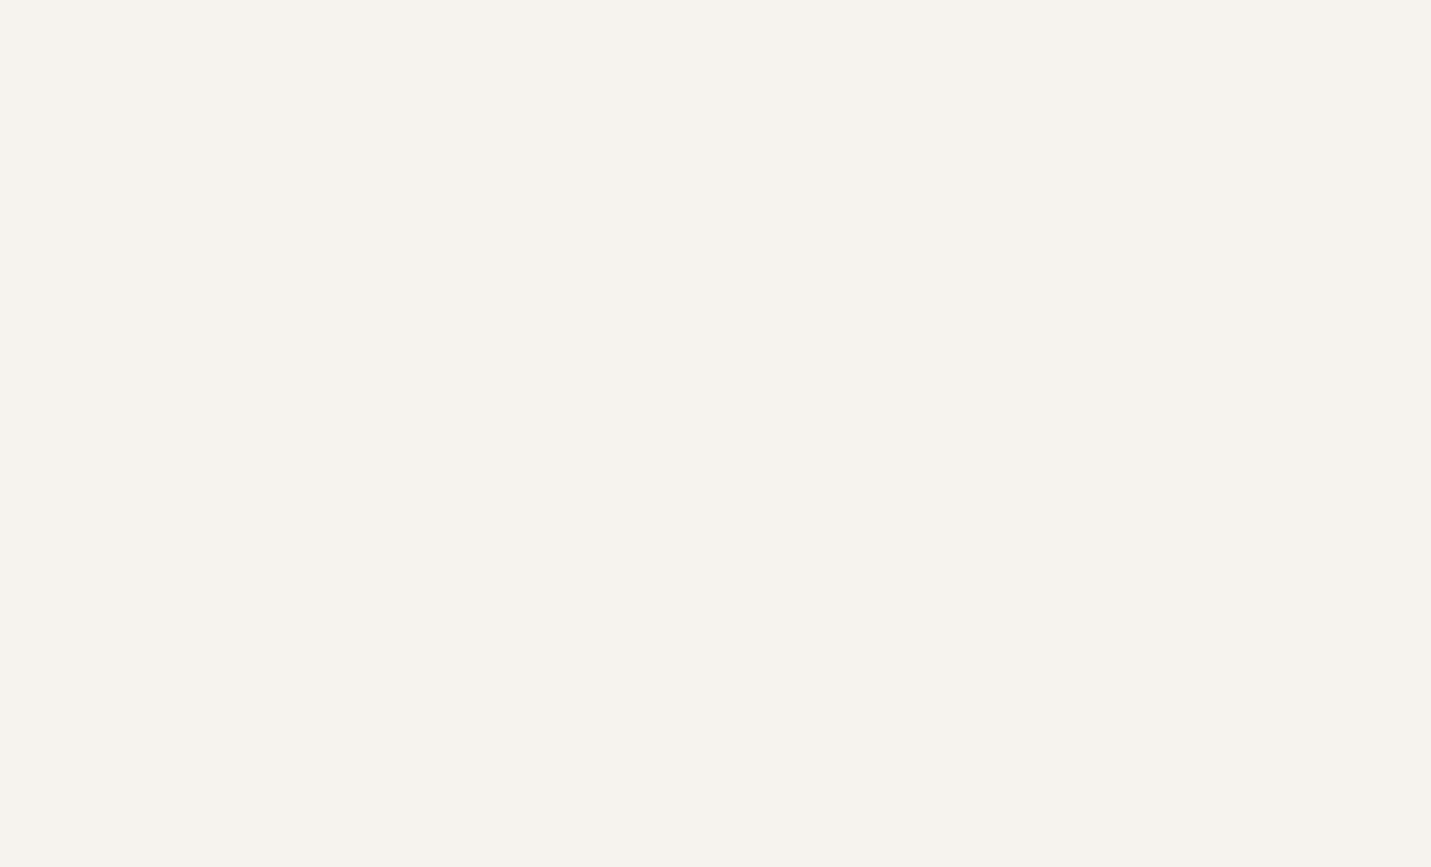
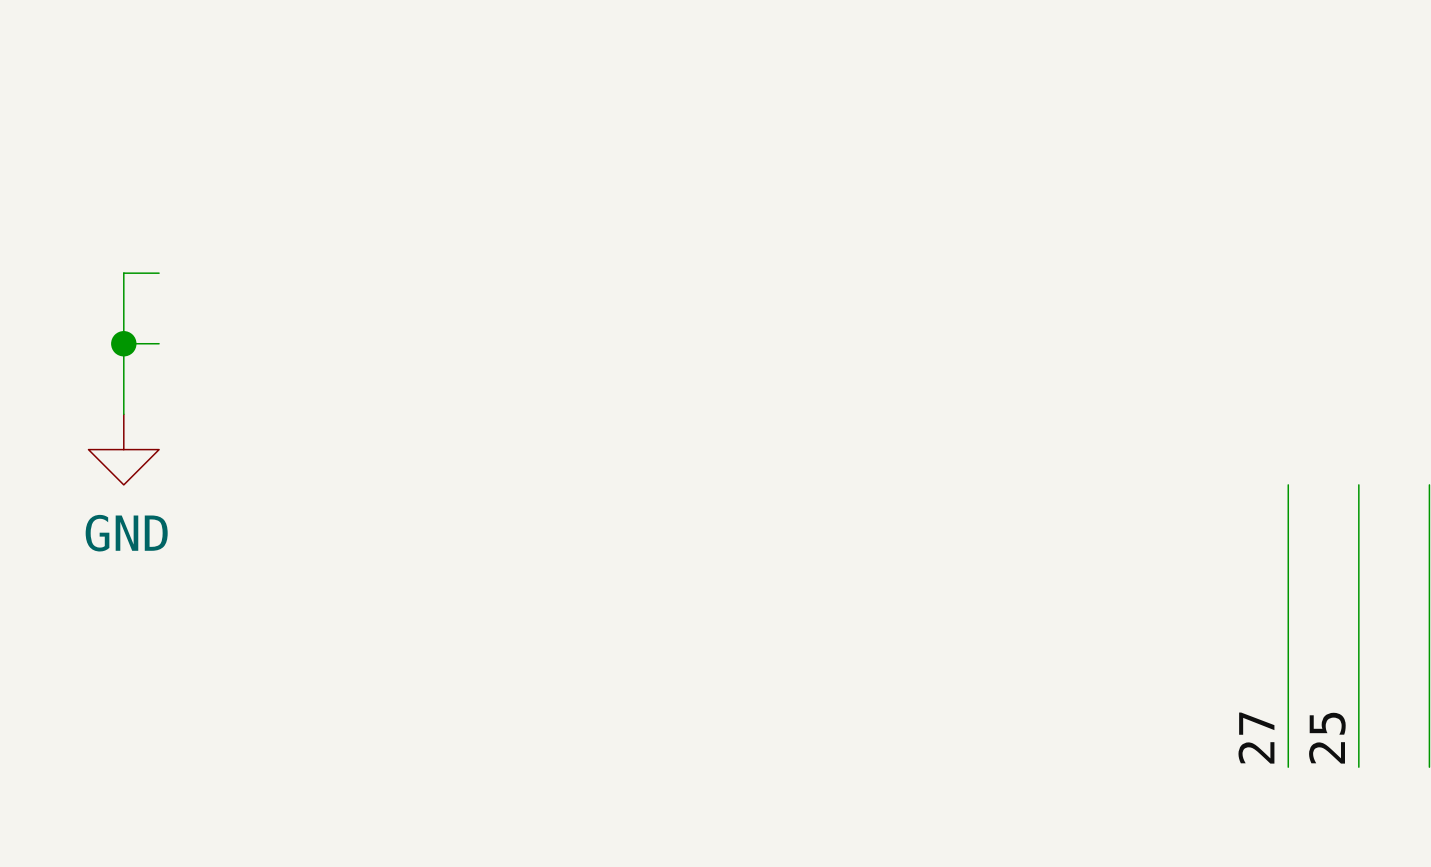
wire: none -> (159, 273) (123, 273) (123, 414)
wire: none -> (123, 343) (159, 343)
junction: none -> (123, 343)
power symbol: none -> GND (123, 449)
wire: none -> (1288, 484) (1288, 767)
wire: none -> (1358, 484) (1358, 767)
wire: none -> (1429, 484) (1429, 767)
label: none -> 27 (1256, 738)
label: none -> 25 (1327, 738)

